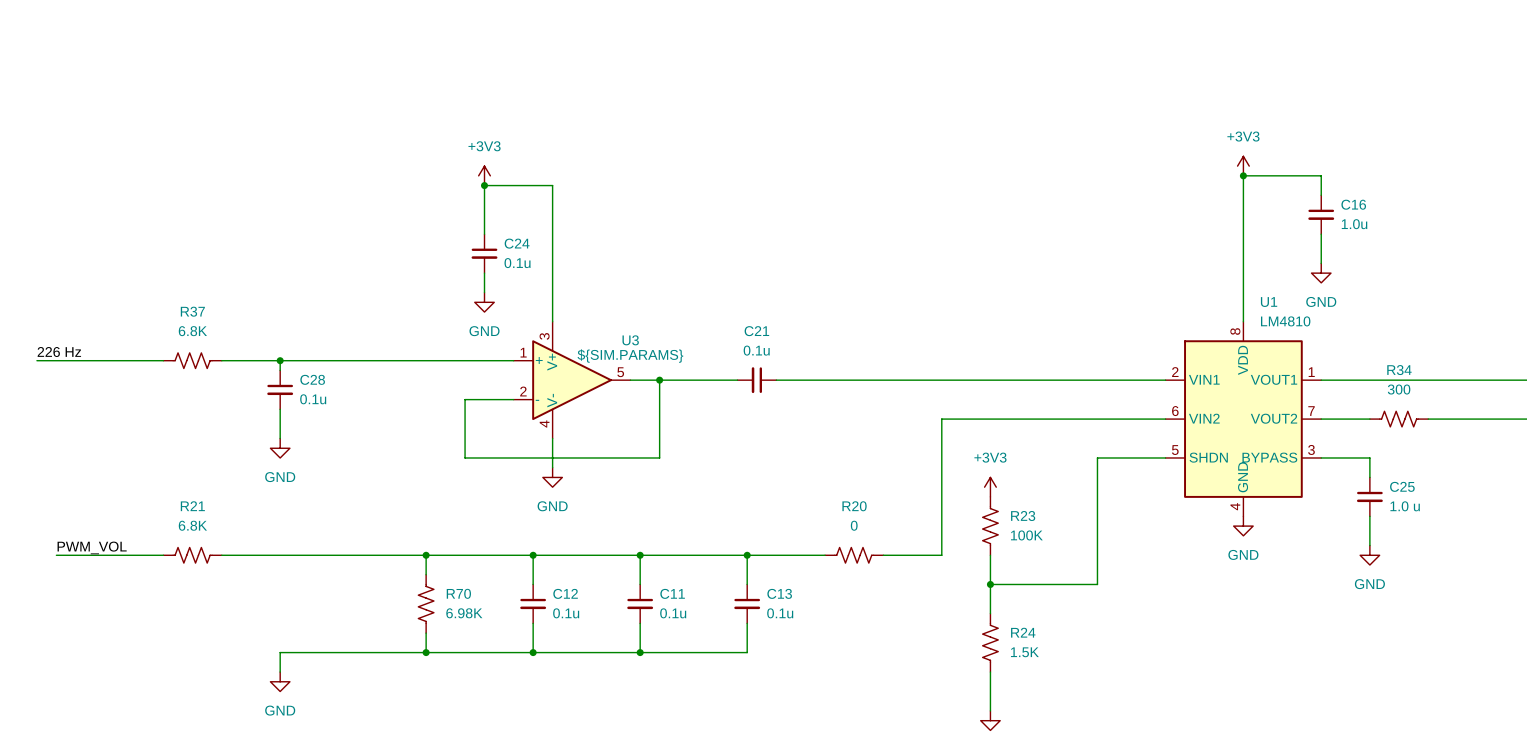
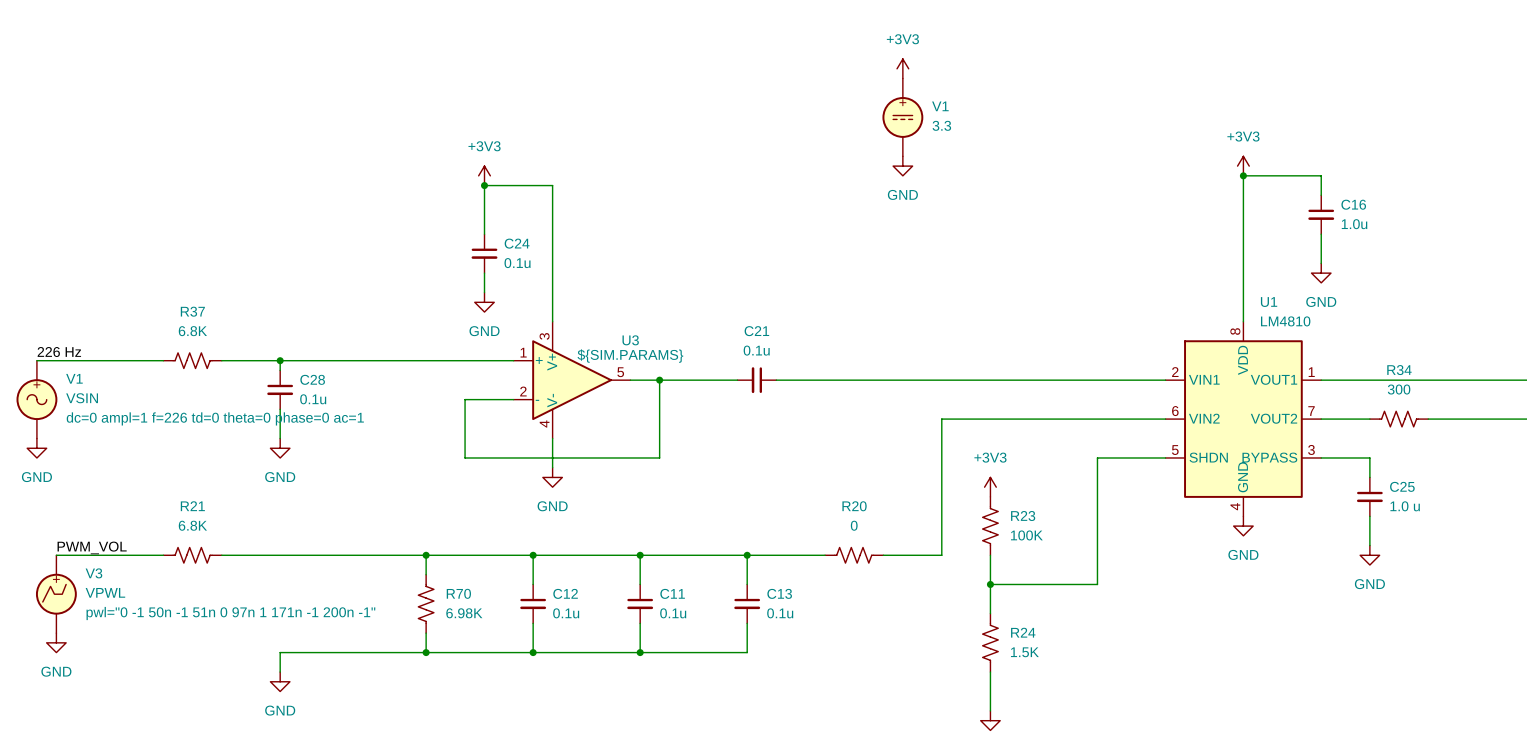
power symbol: none -> +3V3 (902, 68)
V1: none -> 3.3 (902, 117)
power symbol: none -> GND (902, 166)
V1: none -> VSIN (36, 399)
power symbol: none -> GND (36, 448)
V3: none -> VPWL (56, 594)
power symbol: none -> GND (56, 642)

